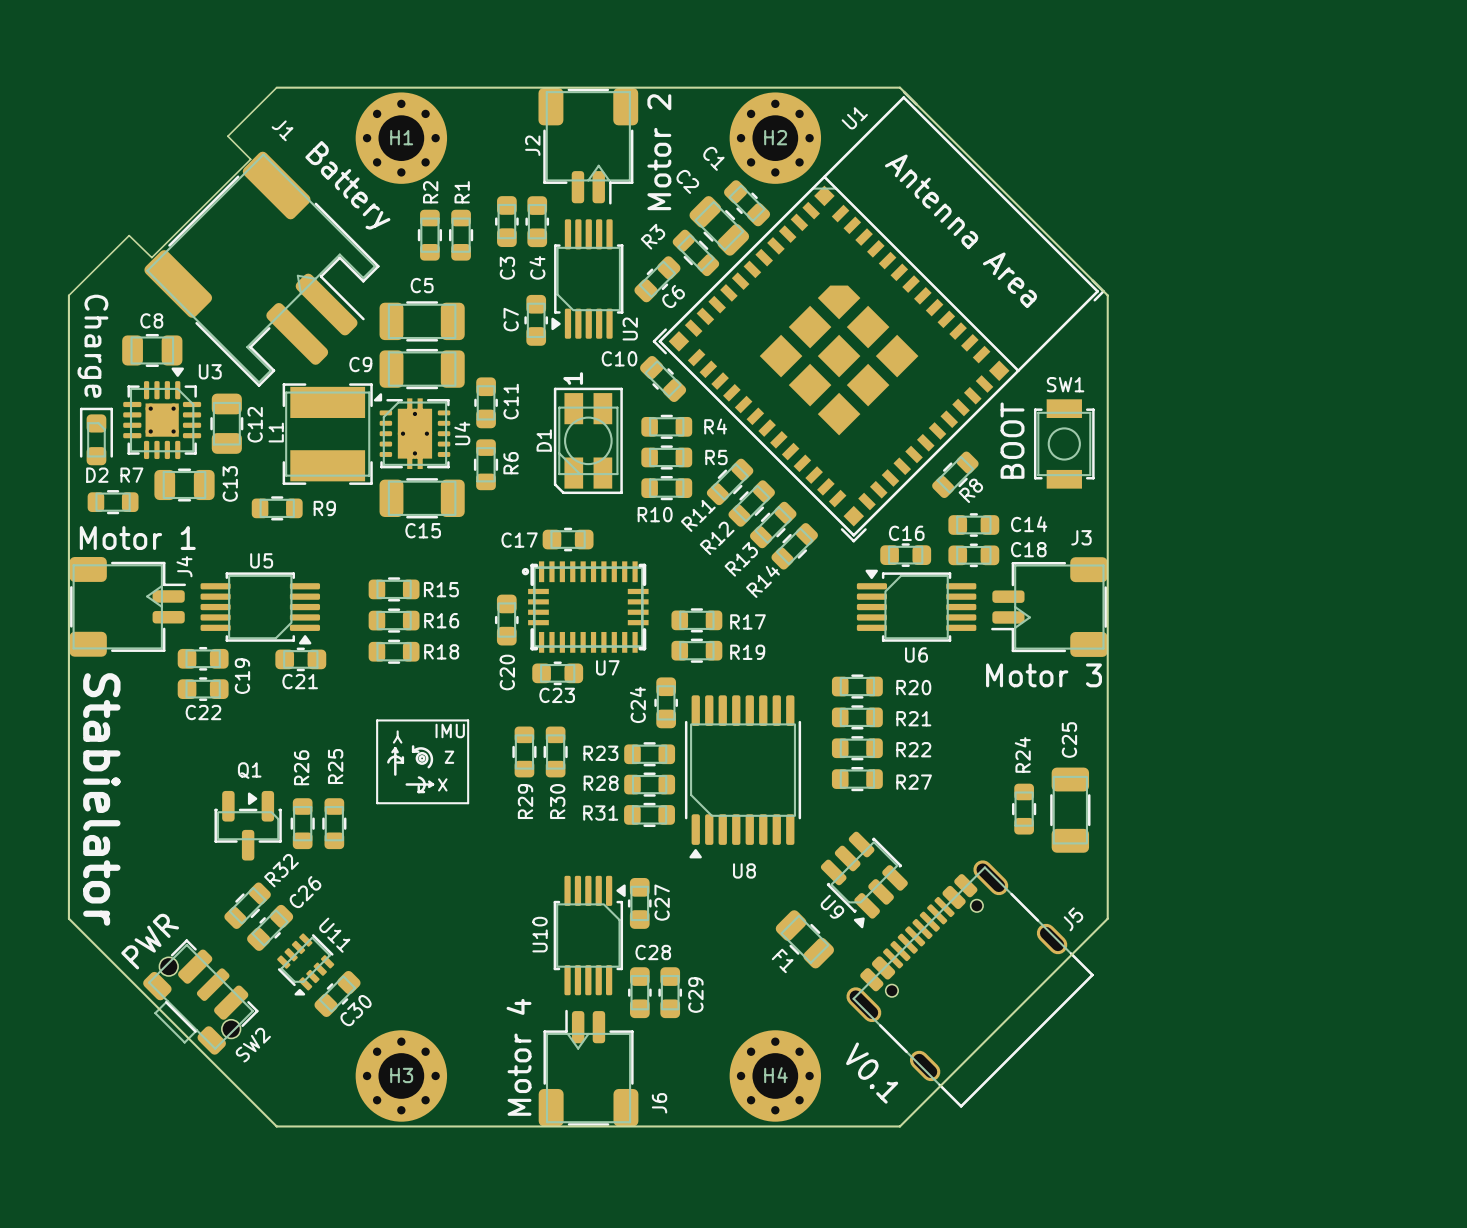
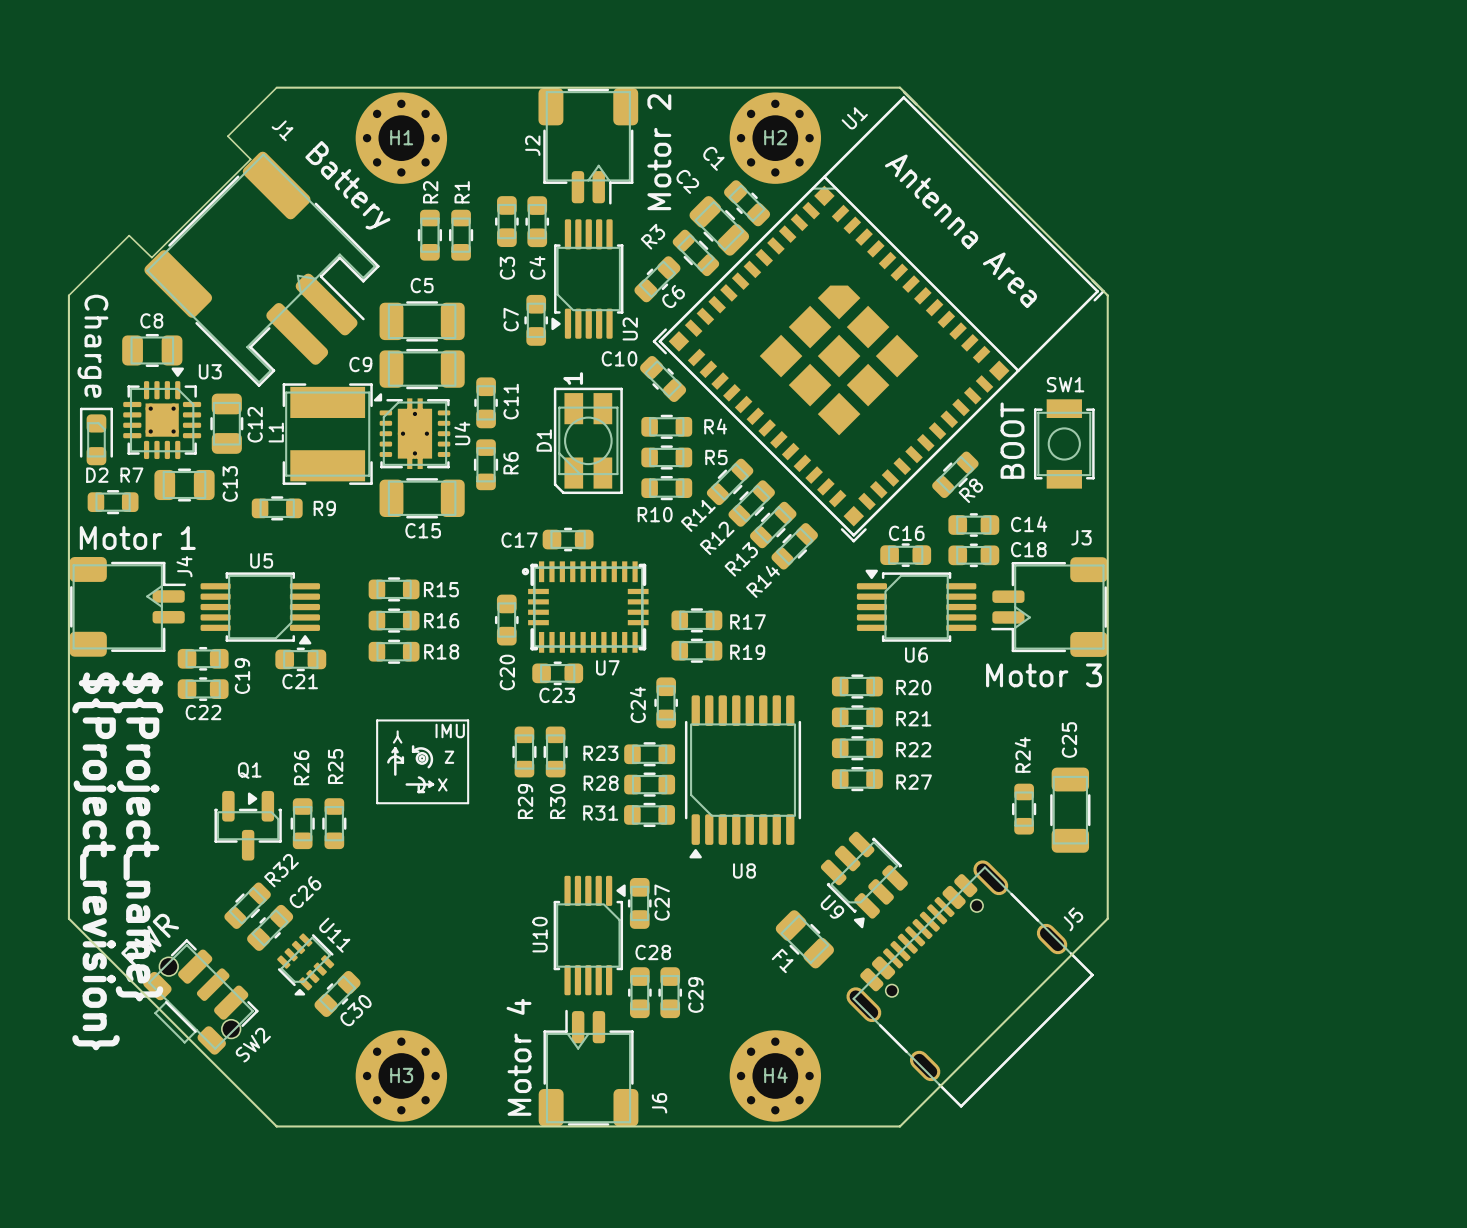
text: Stabielator (101, 799) -> ${Project_revision} (96, 861)
text: none -> ${Project_name} (139, 836)
text: V0.1 (872, 1073) -> none

